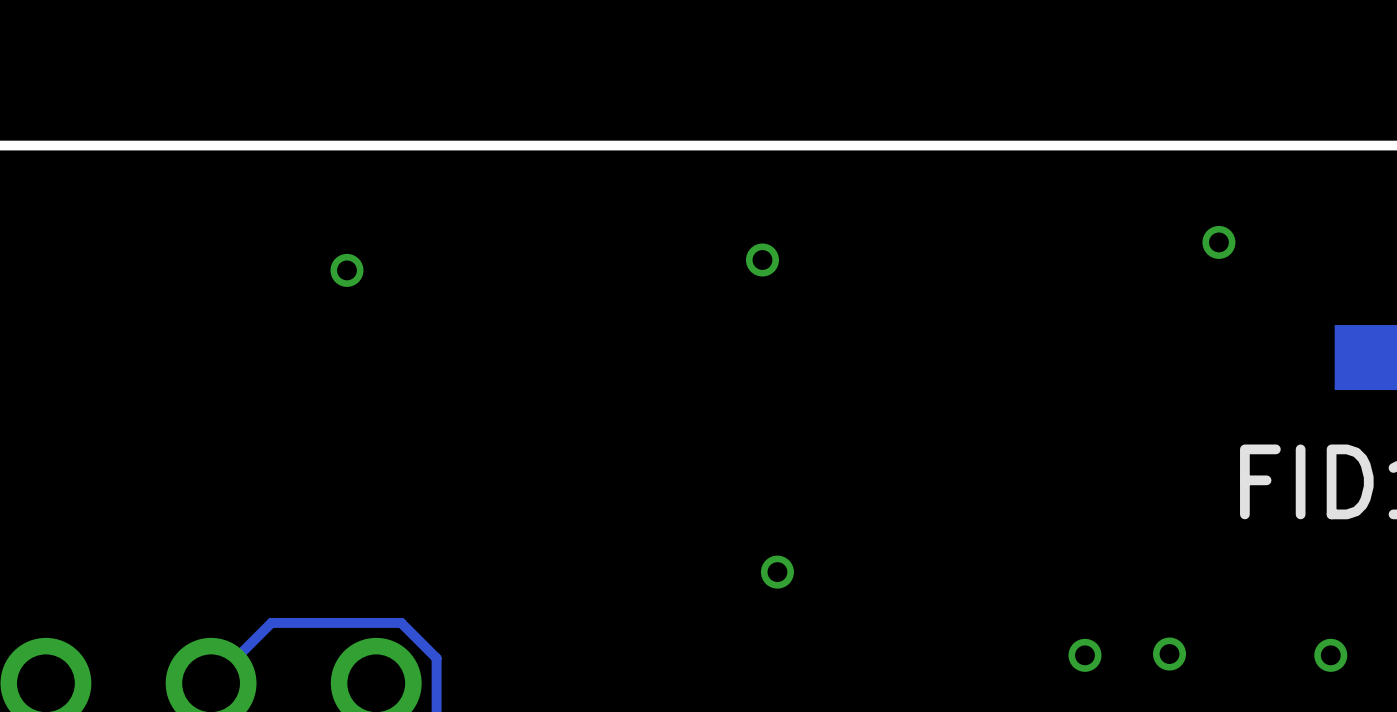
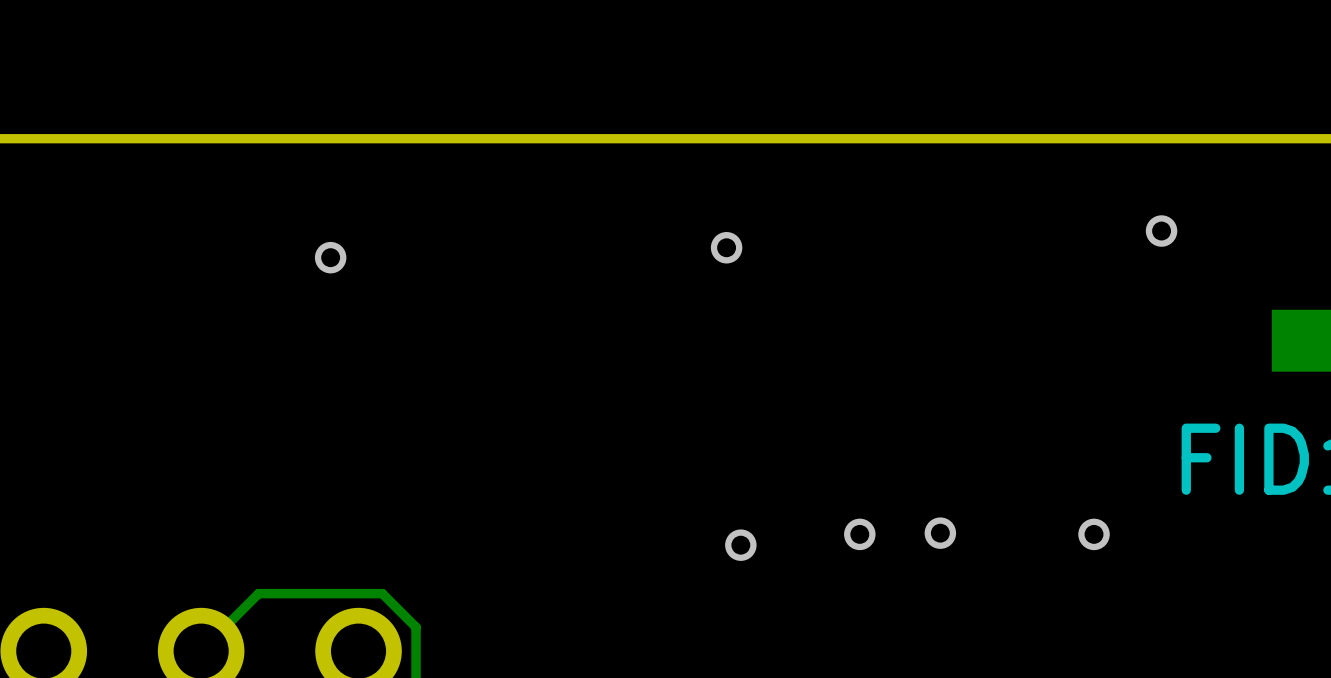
via: none -> (940, 533)
via: none -> (859, 534)
via: none -> (1094, 534)
via: (1169, 654) -> none
via: (1085, 655) -> none
via: (1330, 655) -> none

